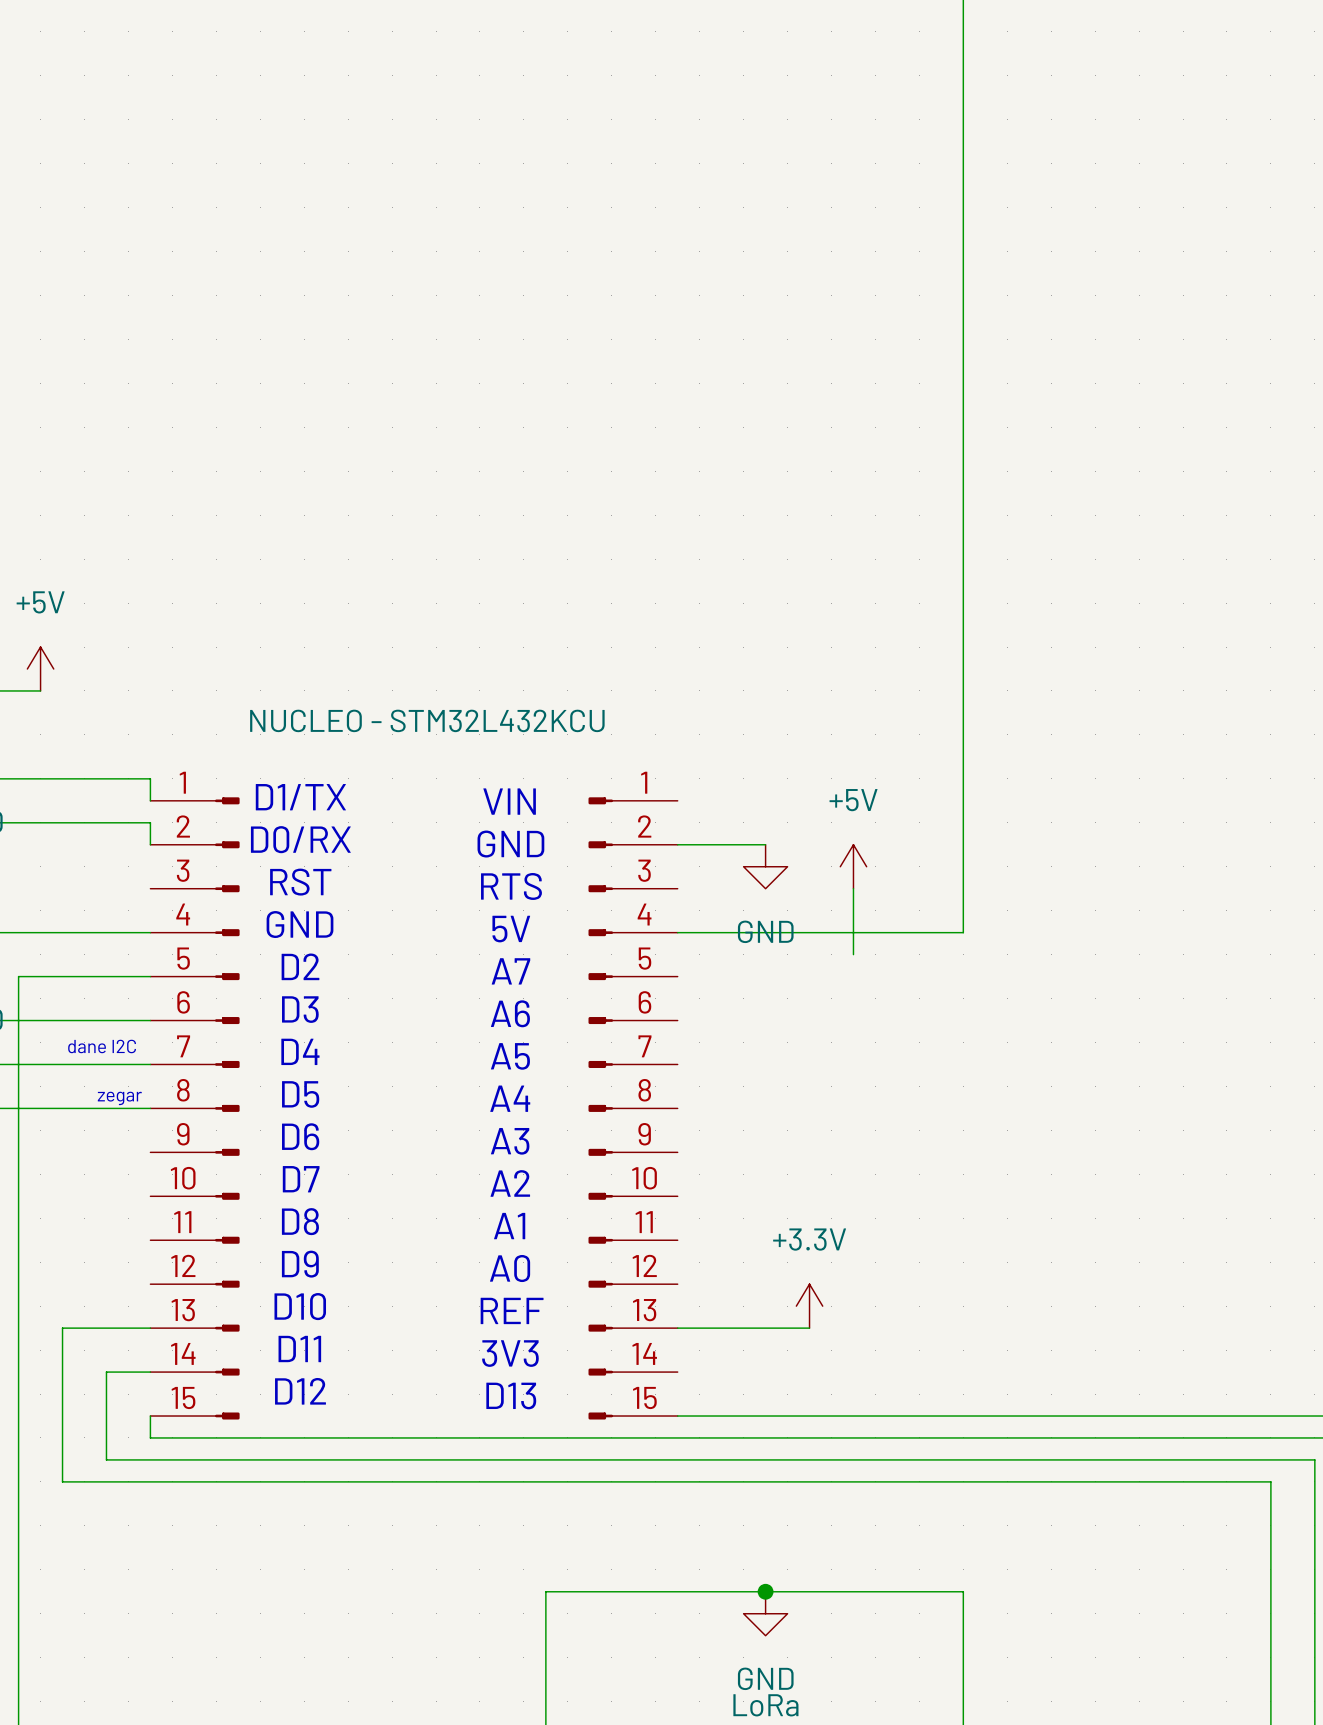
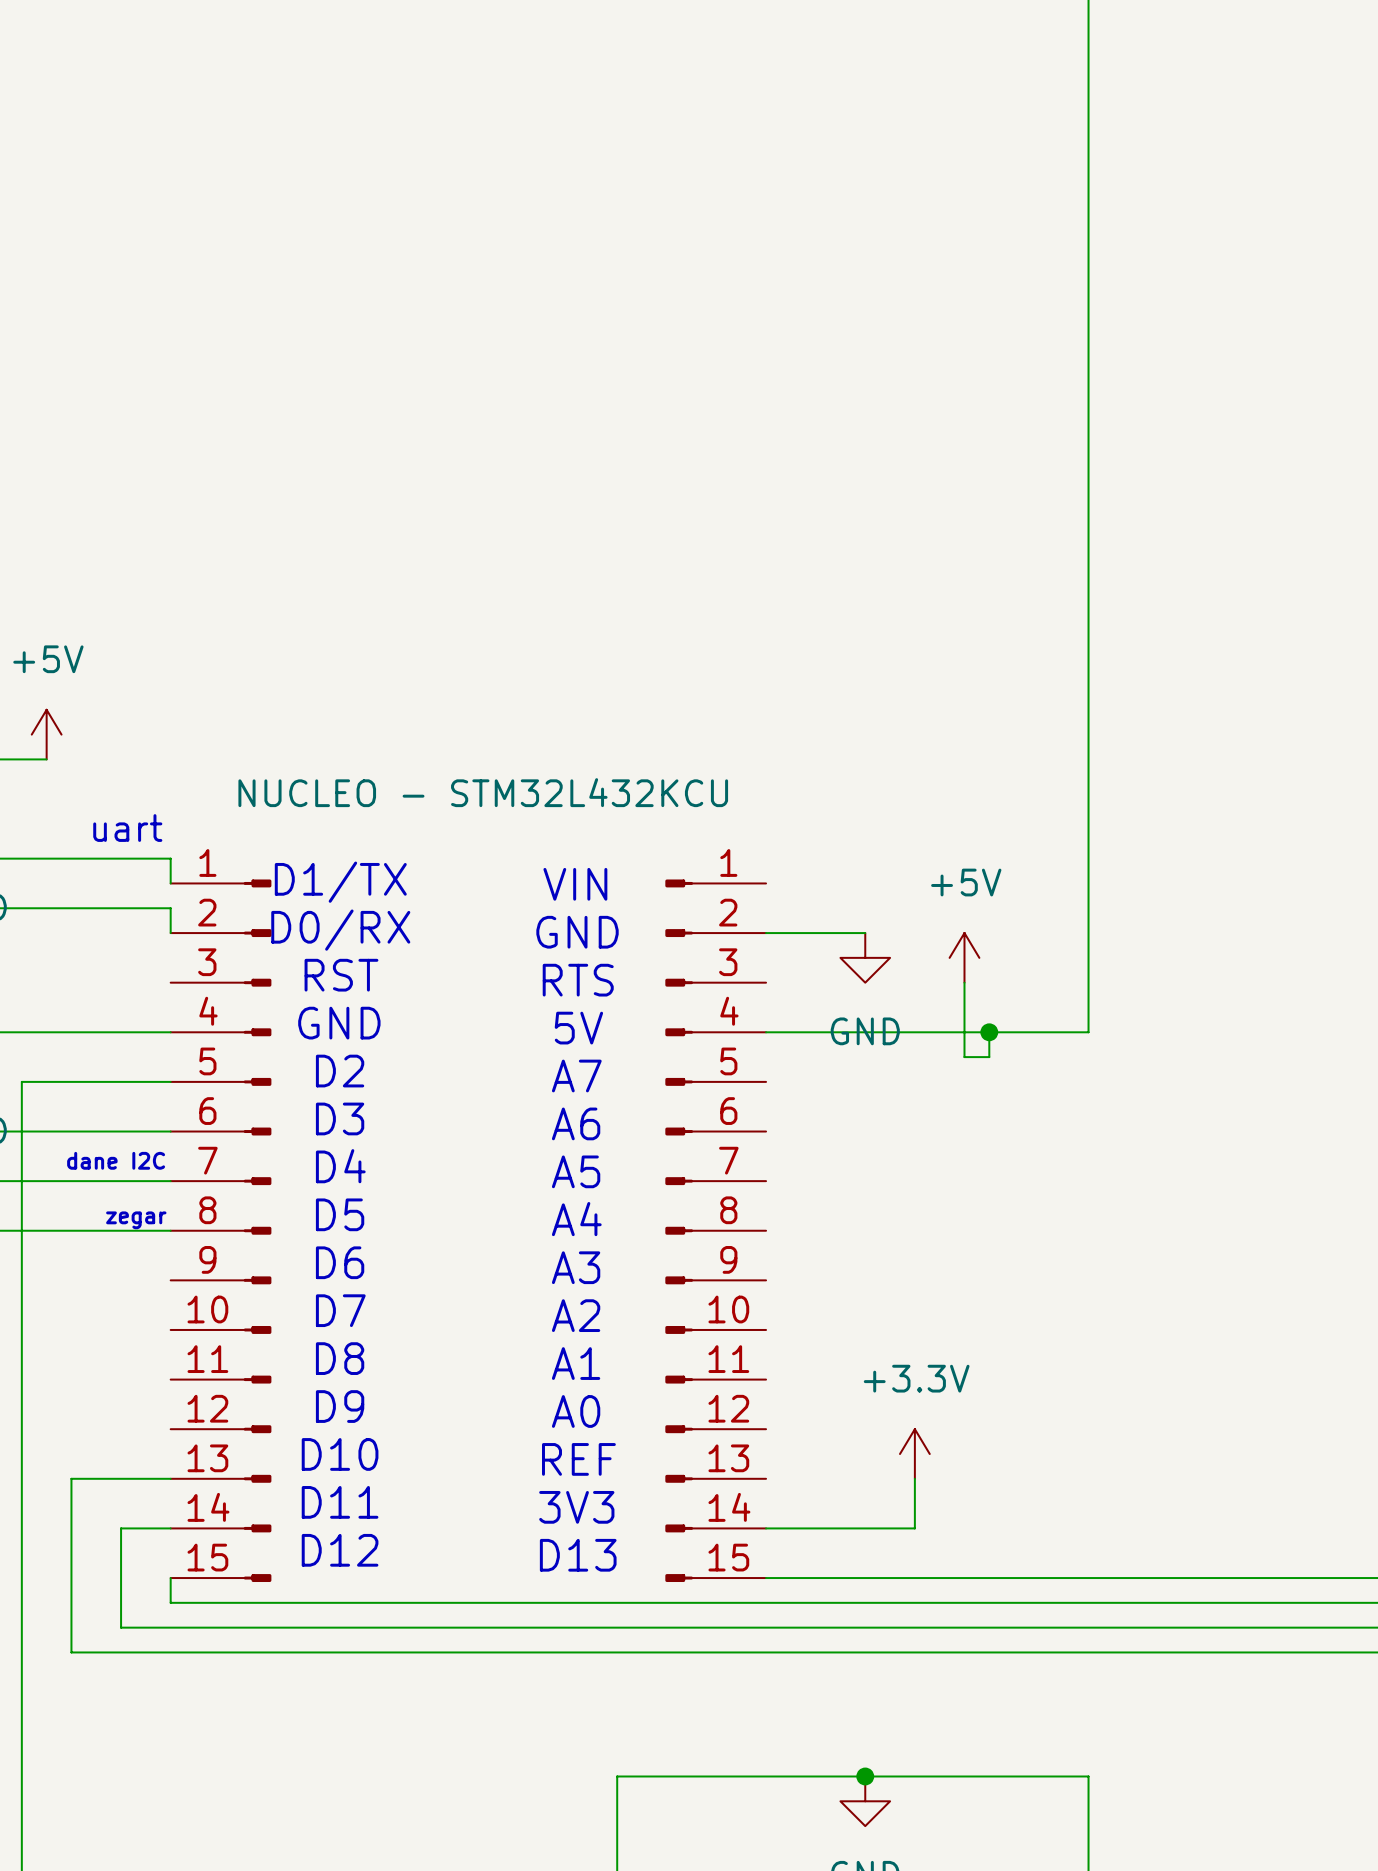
text: none -> uart (127, 828)
wire: none -> (989, 1032) (989, 1057) (964, 1057)
junction: none -> (989, 1032)
wire: (677, 1328) (809, 1328) -> (766, 1528) (914, 1528) (914, 1478)

